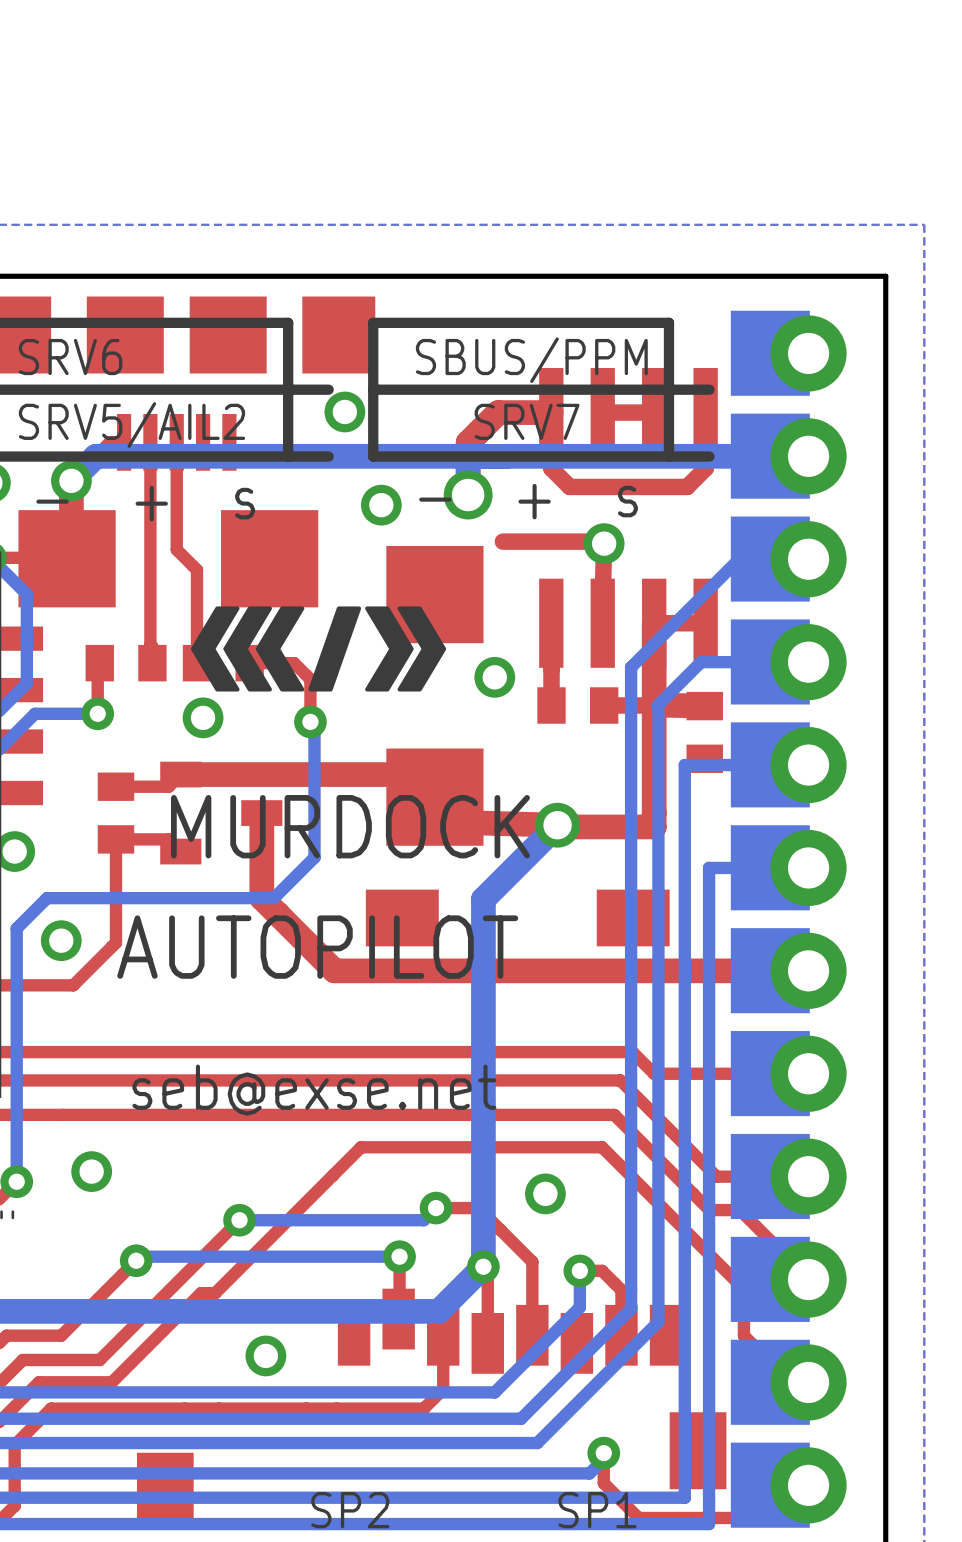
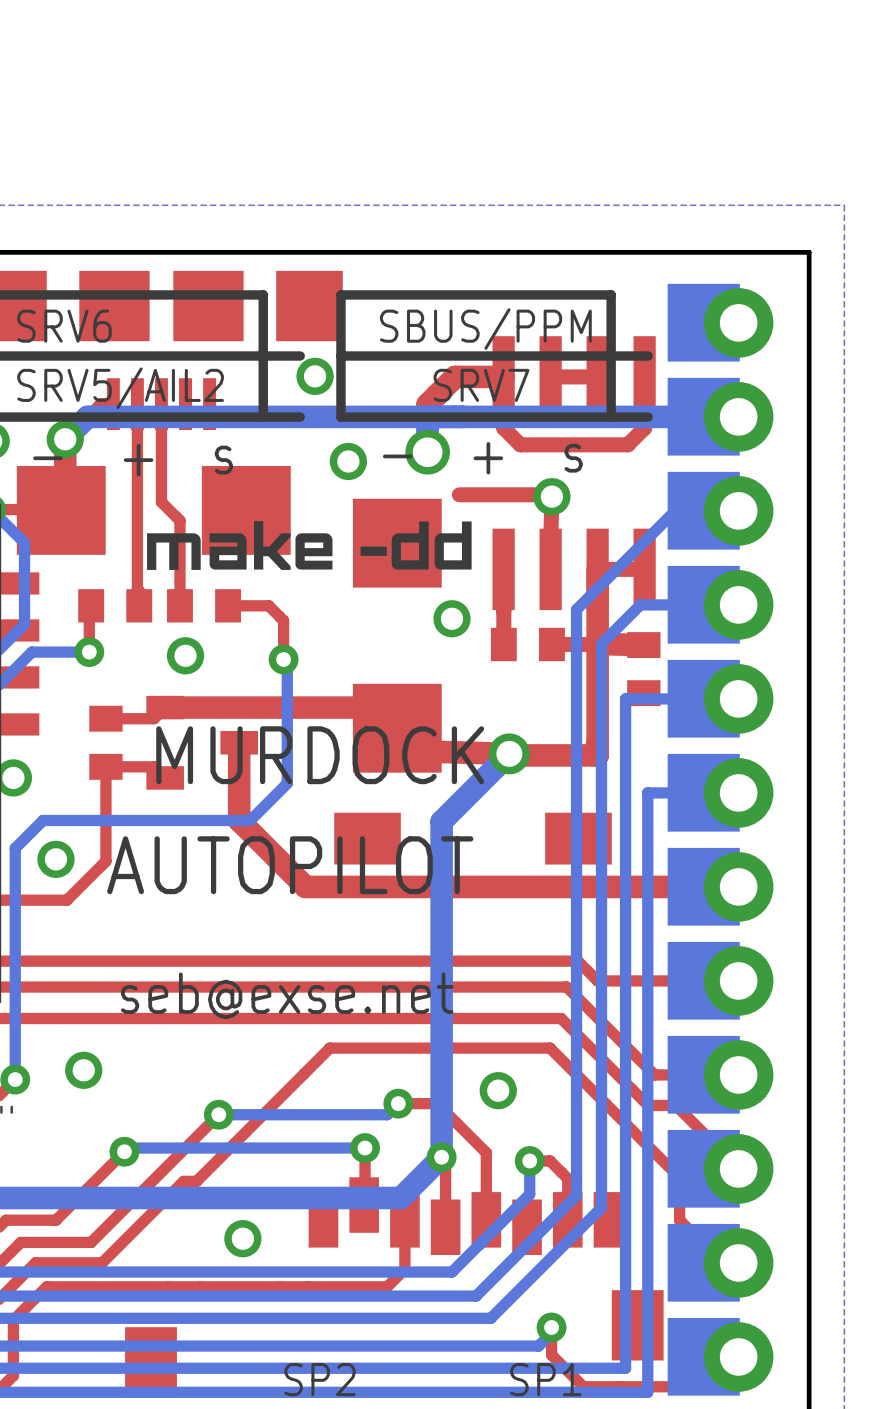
drawing: none -> [147, 521, 472, 570]
drawing: [190, 606, 447, 692] -> none

